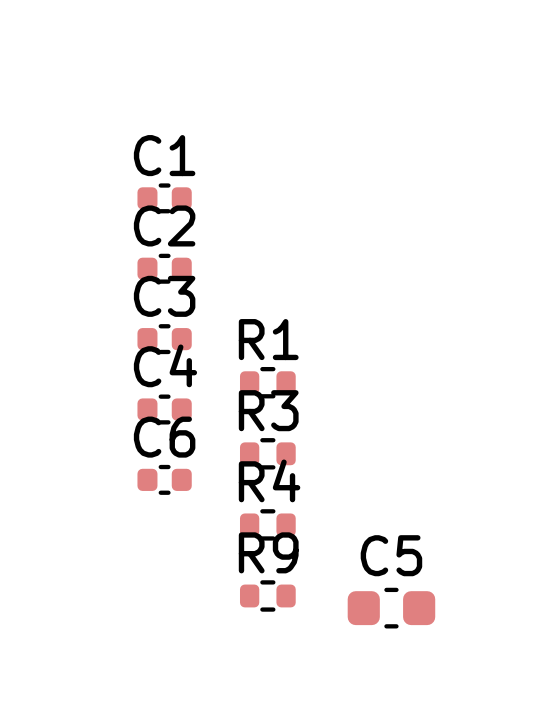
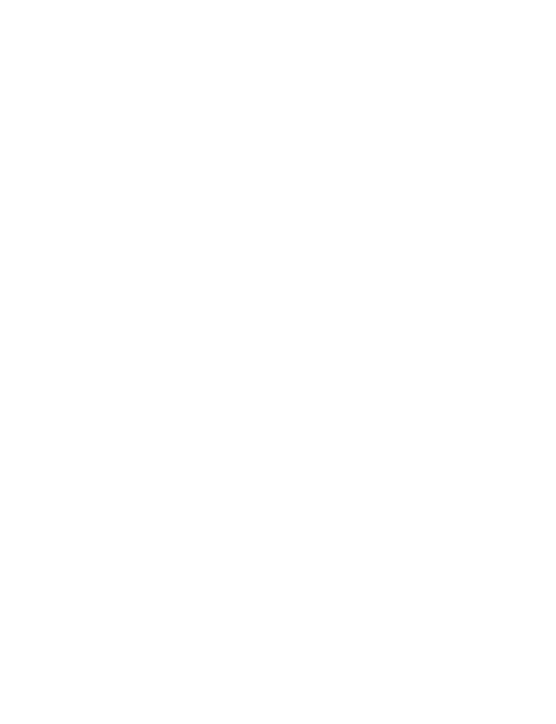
C1: (164, 198) -> none
C2: (164, 268) -> none
C3: (164, 339) -> none
R1: (267, 382) -> none
C4: (164, 409) -> none
R3: (267, 453) -> none
C6: (164, 479) -> none
R4: (267, 524) -> none
R9: (267, 595) -> none
C5: (391, 608) -> none

